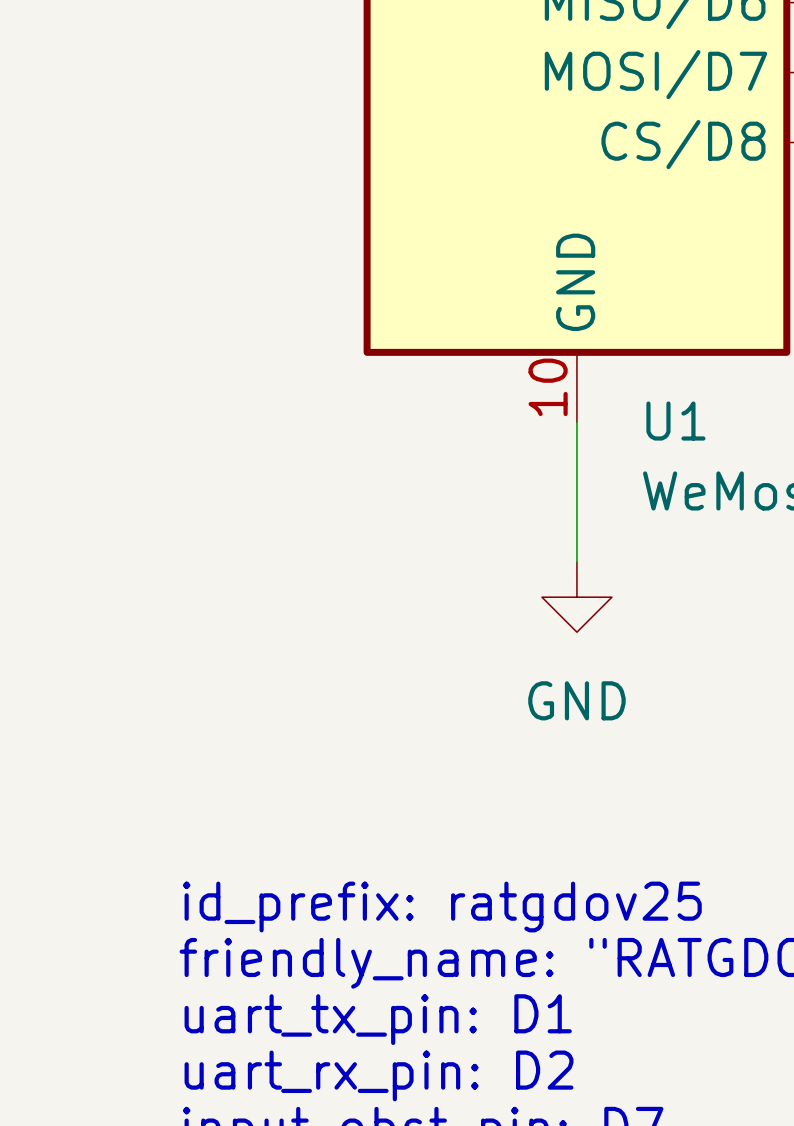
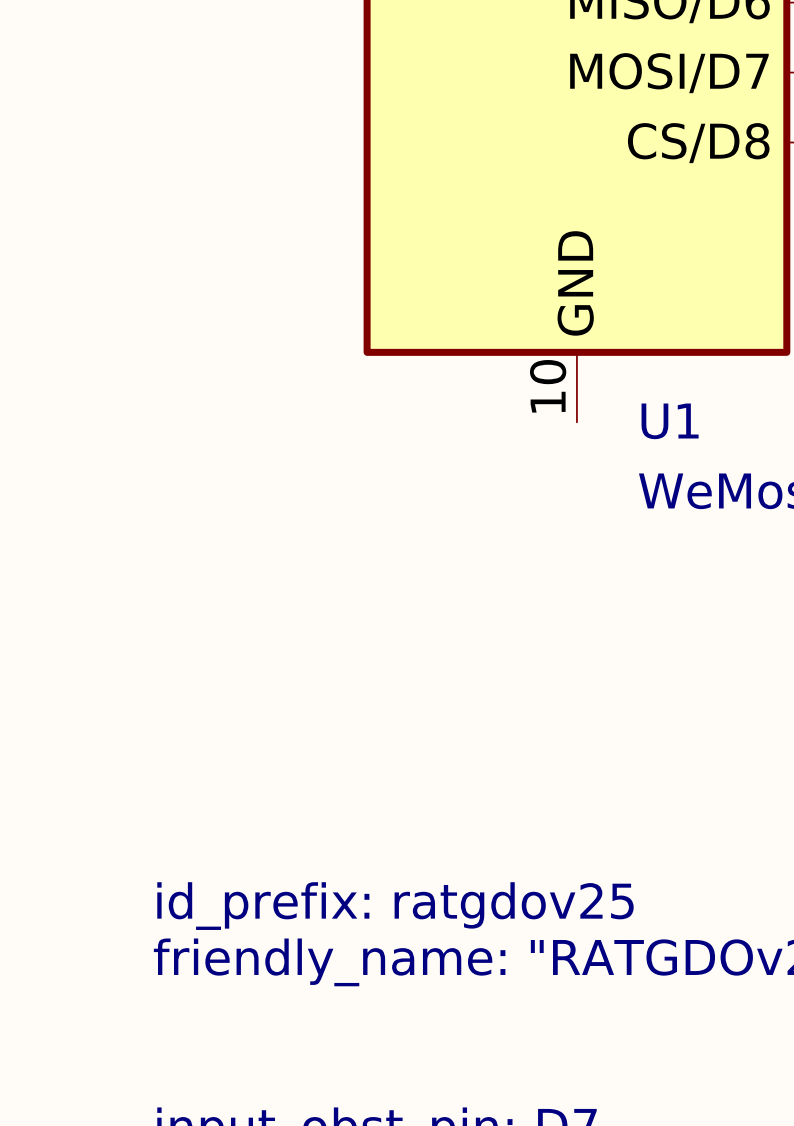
wire: (576, 422) (576, 562) -> none
power symbol: GND (576, 597) -> none
text: uart_tx_pin: D1 (378, 1019) -> none
text: uart_rx_pin: D2 (379, 1075) -> none

